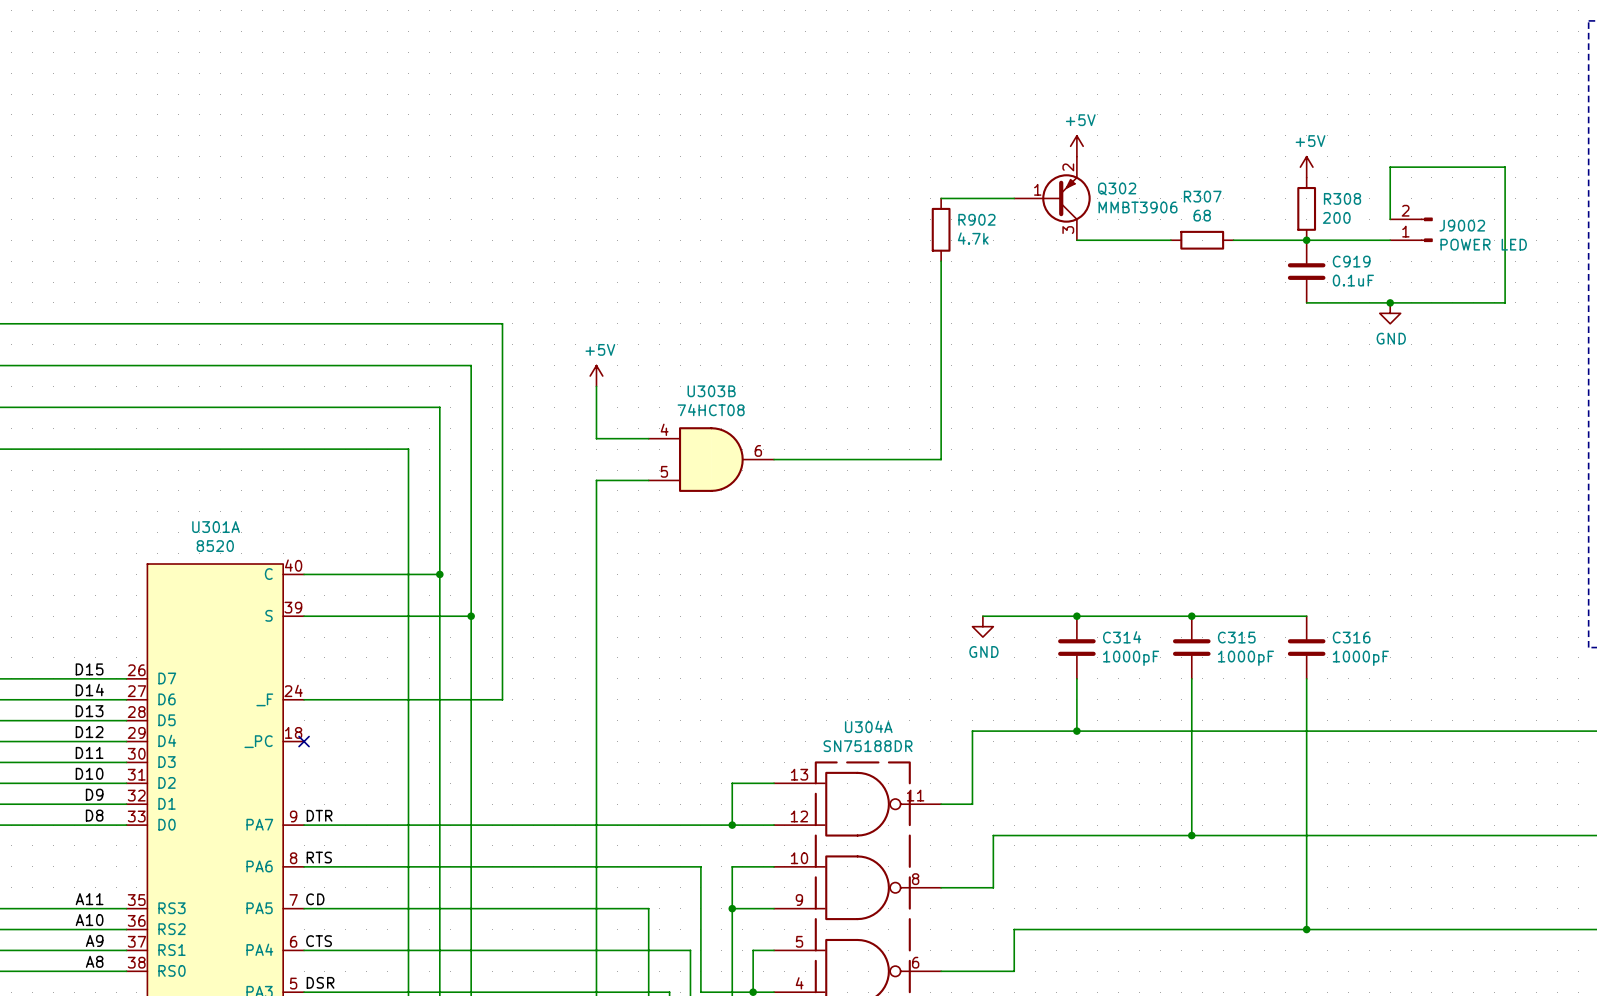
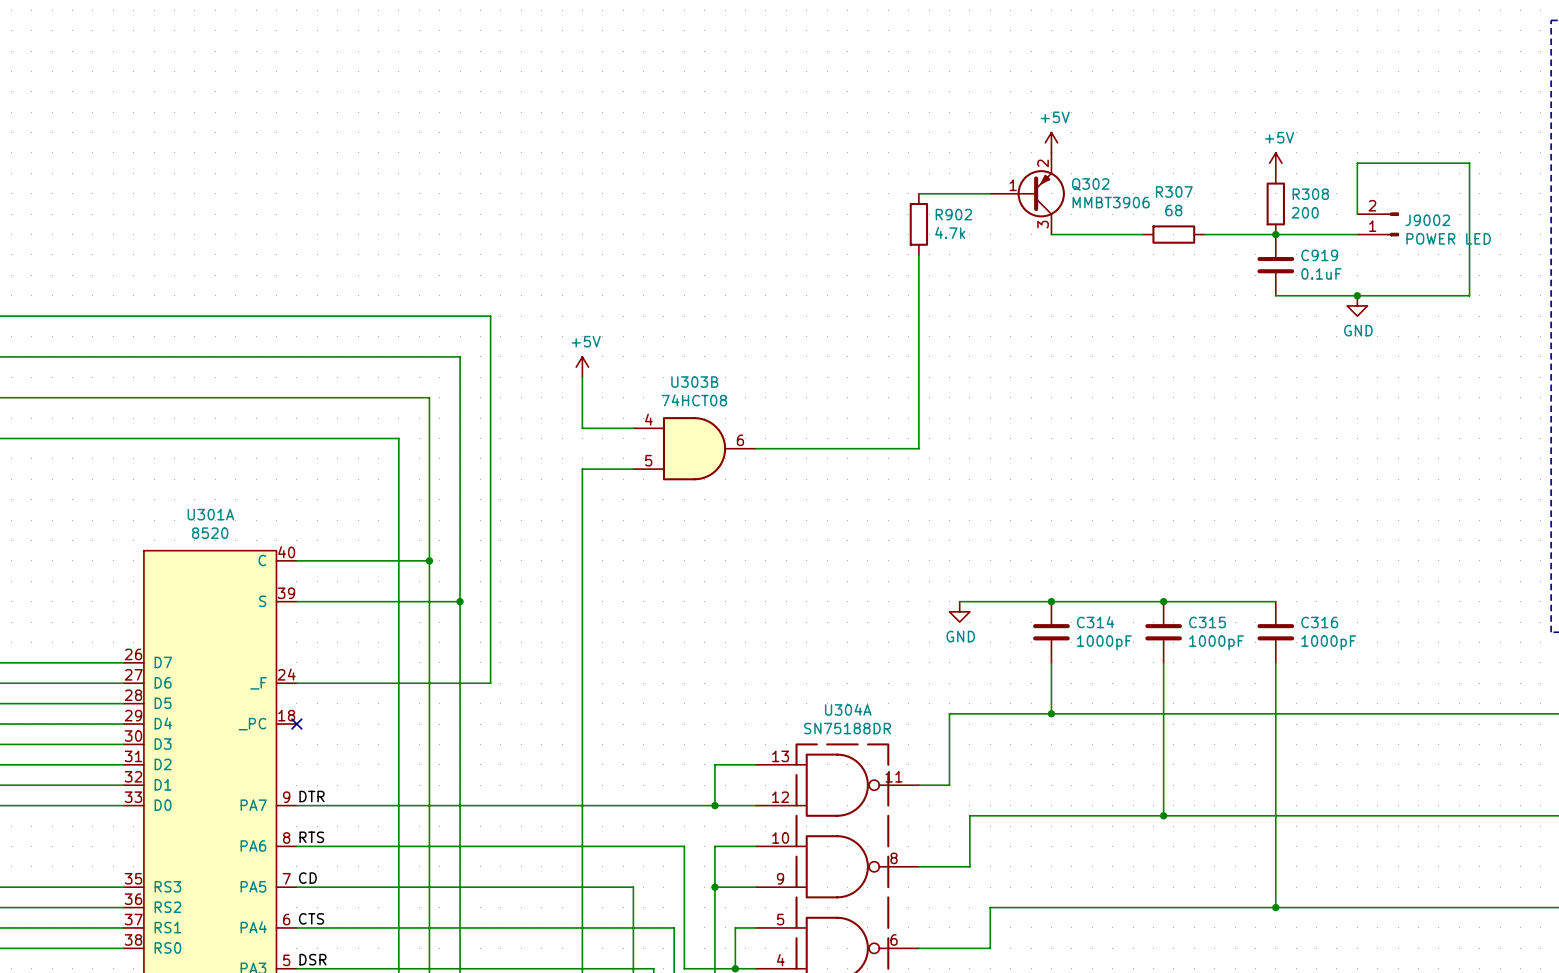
label: D15 (89, 669) -> none
label: D14 (89, 690) -> none
label: D13 (89, 711) -> none
label: D12 (89, 732) -> none
label: D11 (89, 752) -> none
label: D10 (89, 773) -> none
label: D9 (94, 794) -> none
label: D8 (94, 815) -> none
label: A11 (89, 899) -> none
label: A10 (89, 920) -> none
label: A9 (94, 940) -> none
label: A8 (94, 961) -> none

